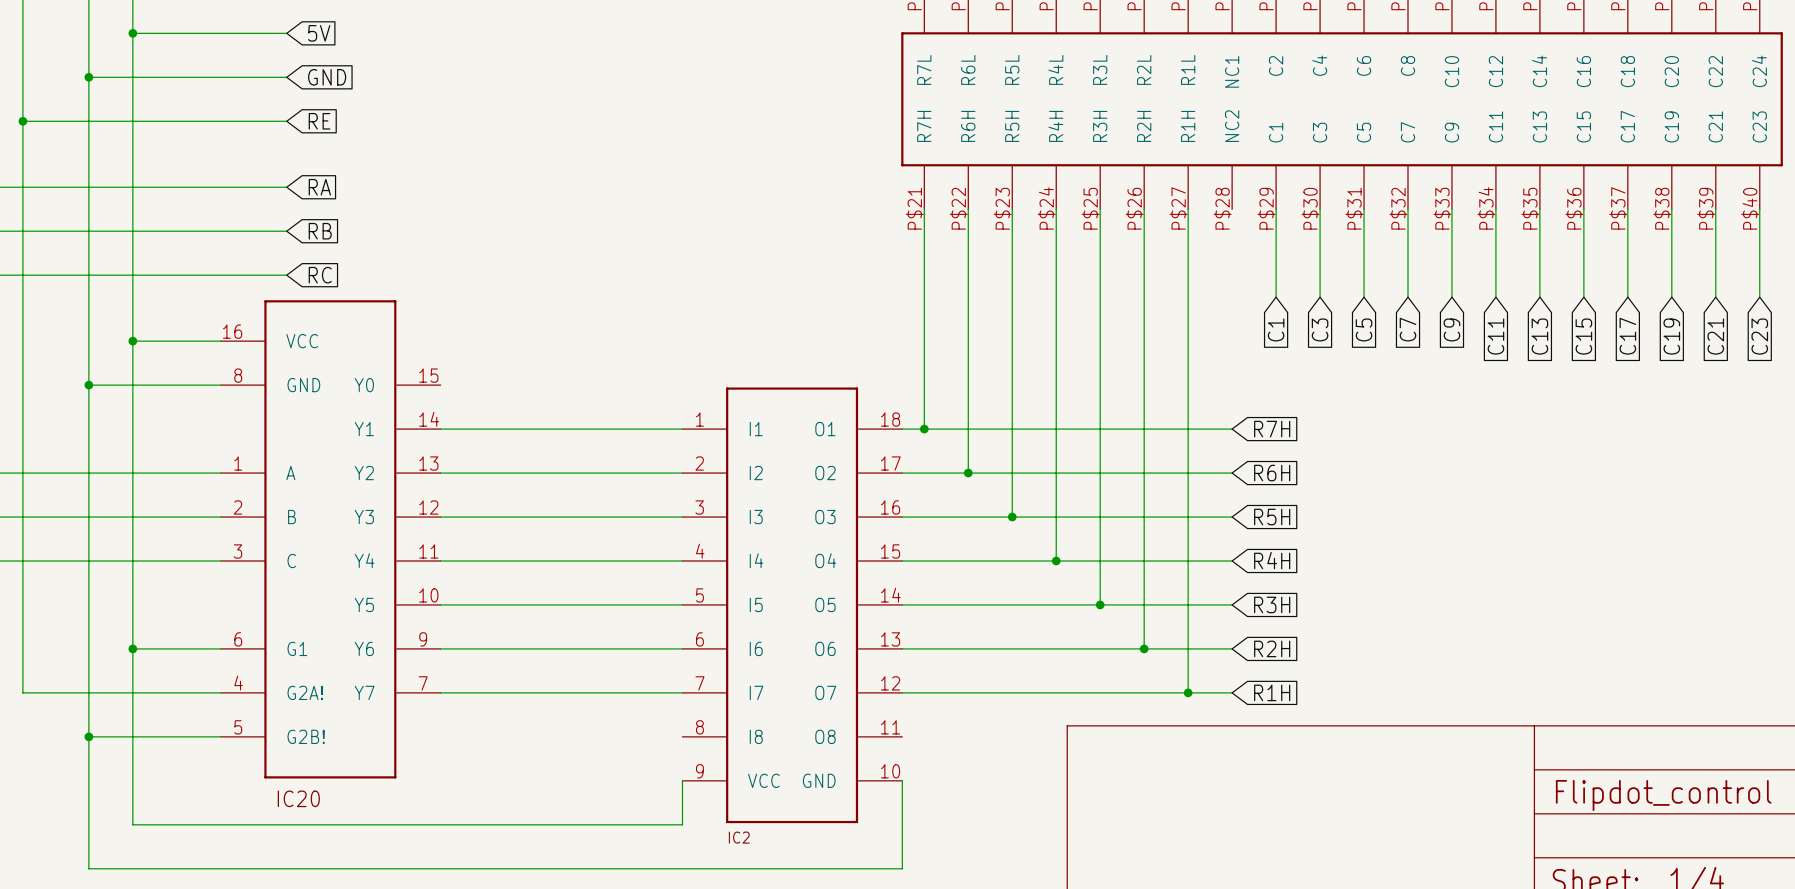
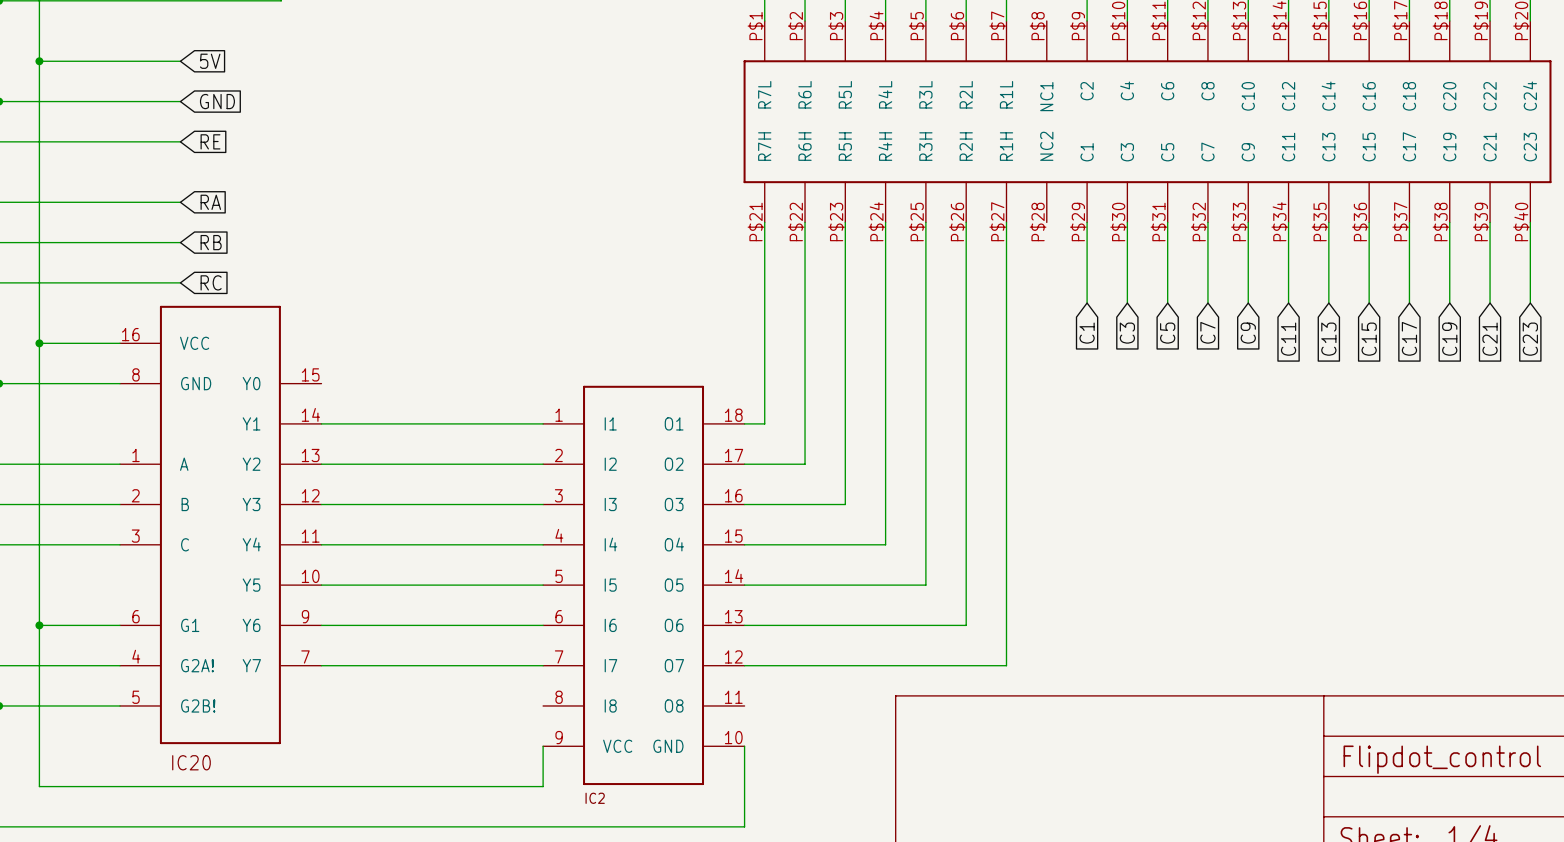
wire: (924, 429) (1232, 429) -> none
junction: (924, 429) -> none
global label: R7H (1272, 429) -> none
wire: (968, 473) (1232, 473) -> none
junction: (968, 473) -> none
global label: R6H (1272, 473) -> none
wire: (1012, 517) (1232, 517) -> none
junction: (1012, 517) -> none
global label: R5H (1272, 517) -> none
wire: (1056, 560) (1232, 560) -> none
junction: (1056, 560) -> none
global label: R4H (1272, 560) -> none
wire: (1100, 604) (1232, 604) -> none
junction: (1100, 604) -> none
global label: R3H (1272, 604) -> none
wire: (1144, 648) (1232, 648) -> none
junction: (1144, 648) -> none
global label: R2H (1272, 648) -> none
wire: (1188, 692) (1232, 692) -> none
junction: (1188, 692) -> none
global label: R1H (1272, 692) -> none

